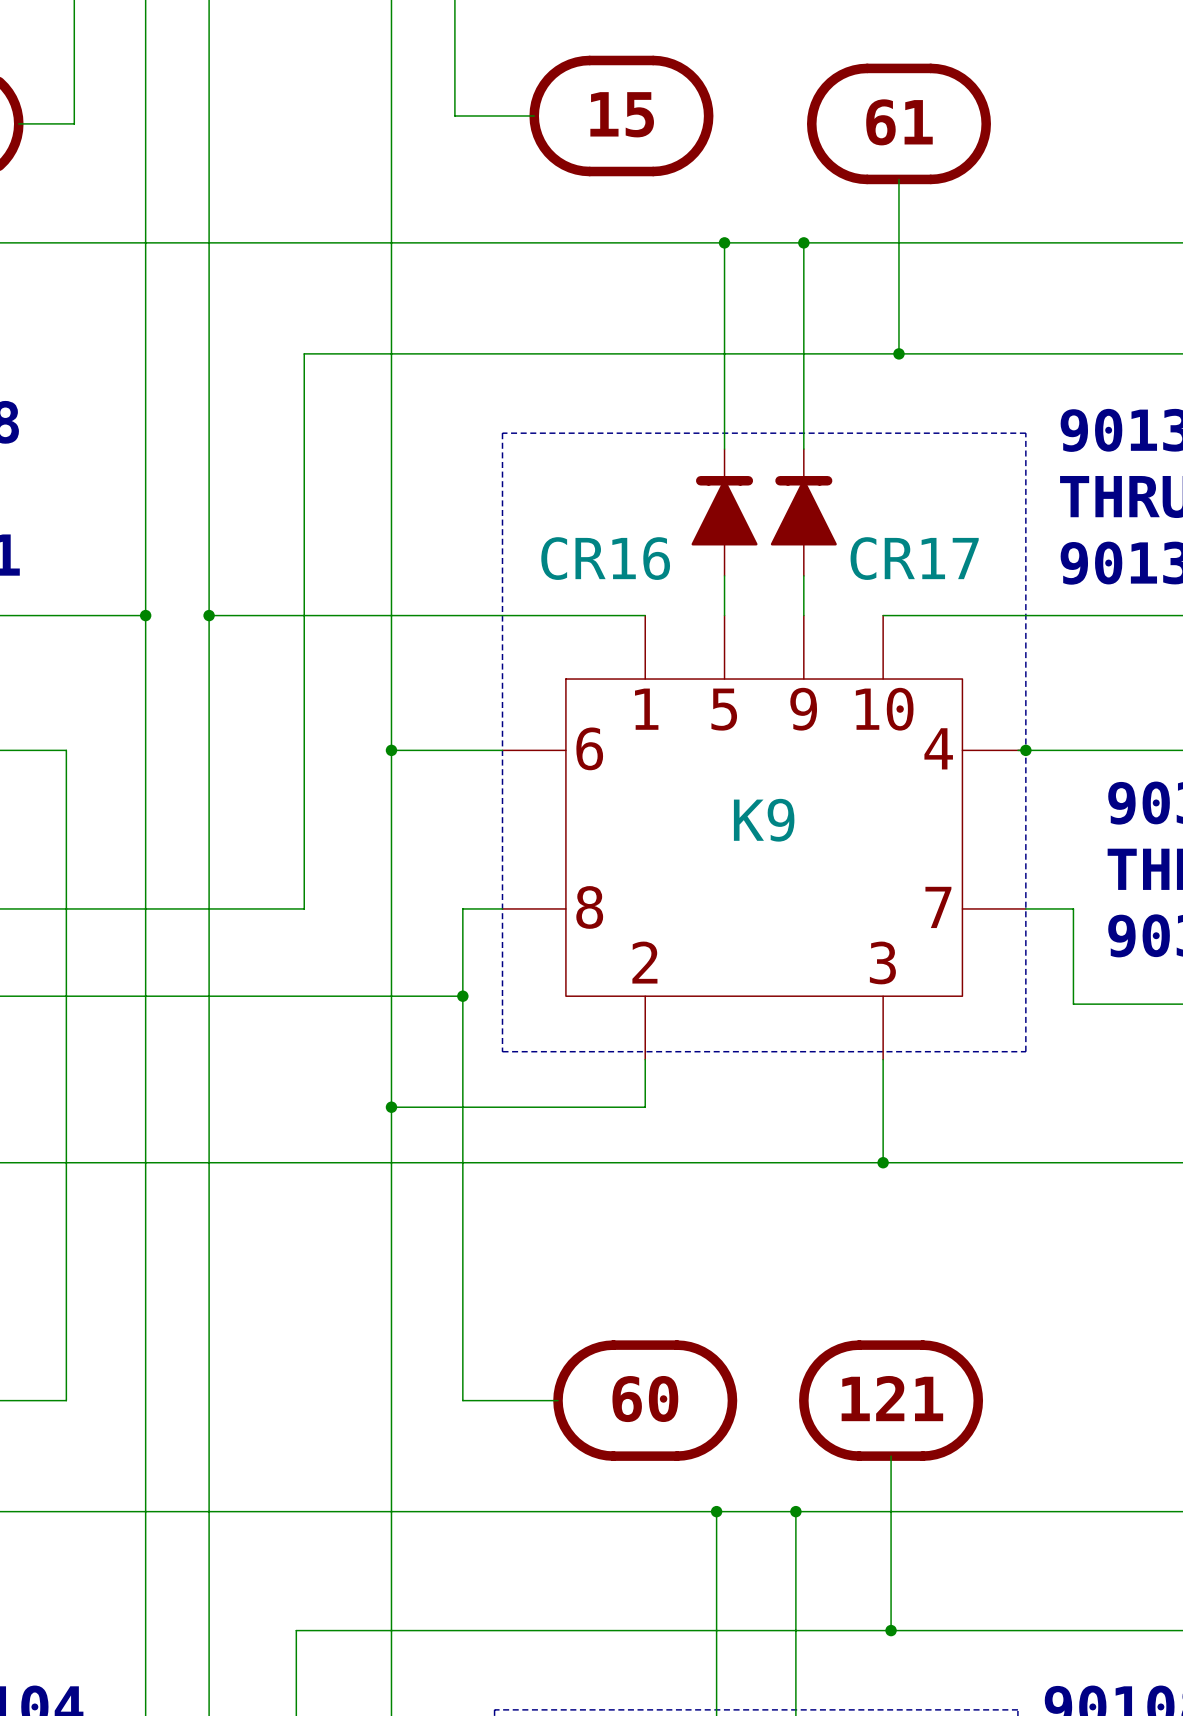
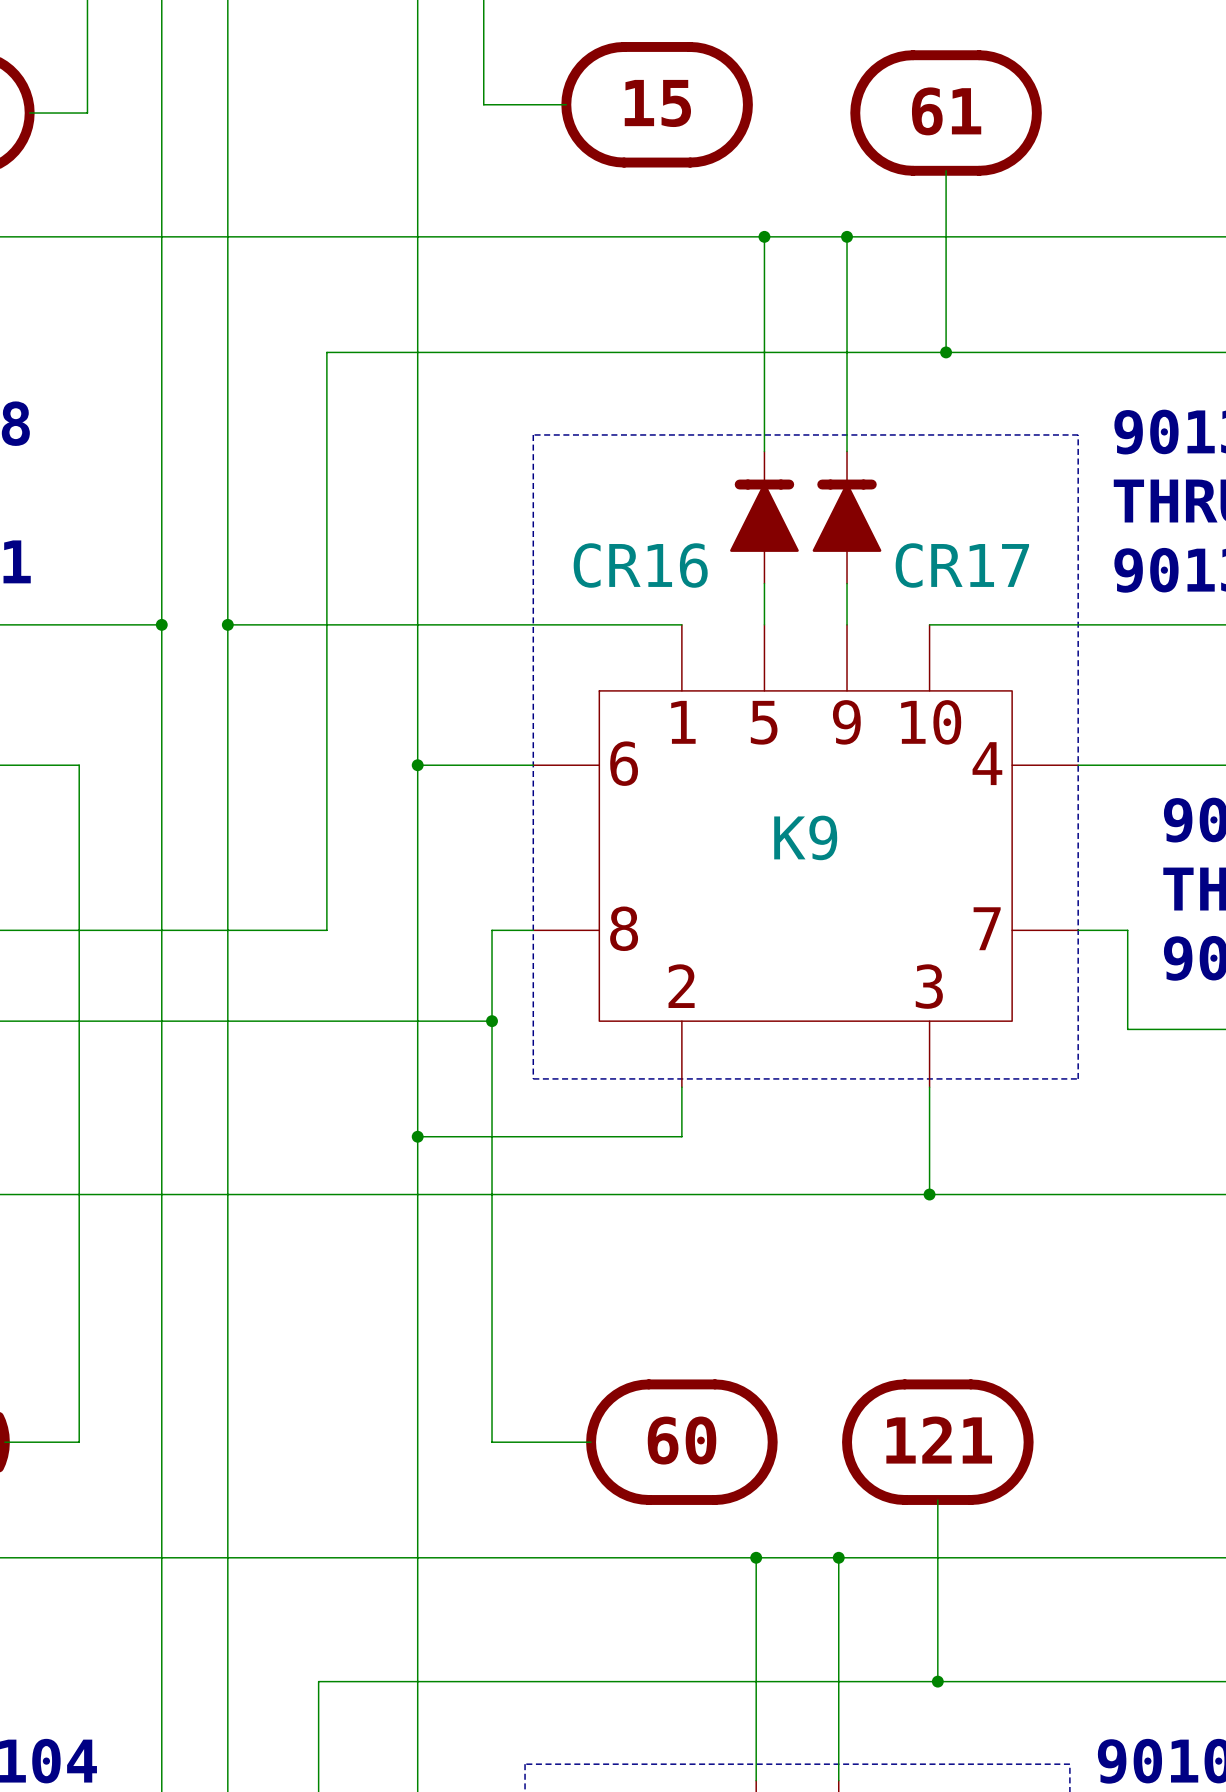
junction: (1025, 750) -> none

